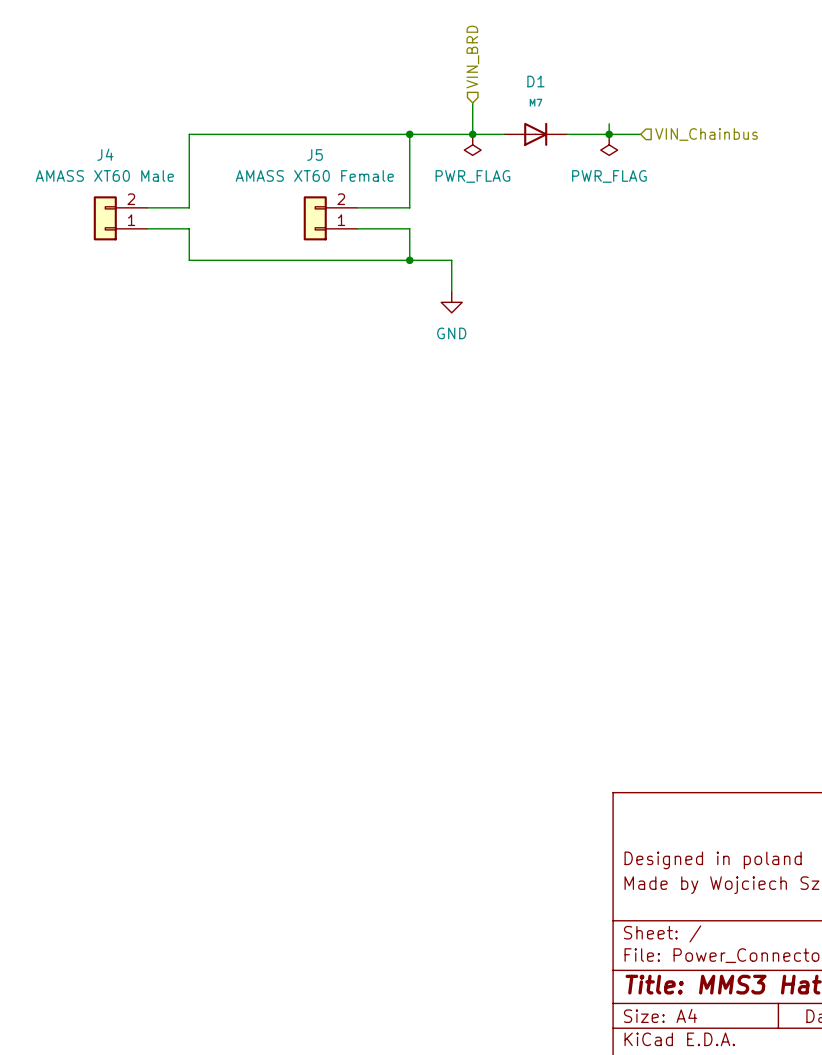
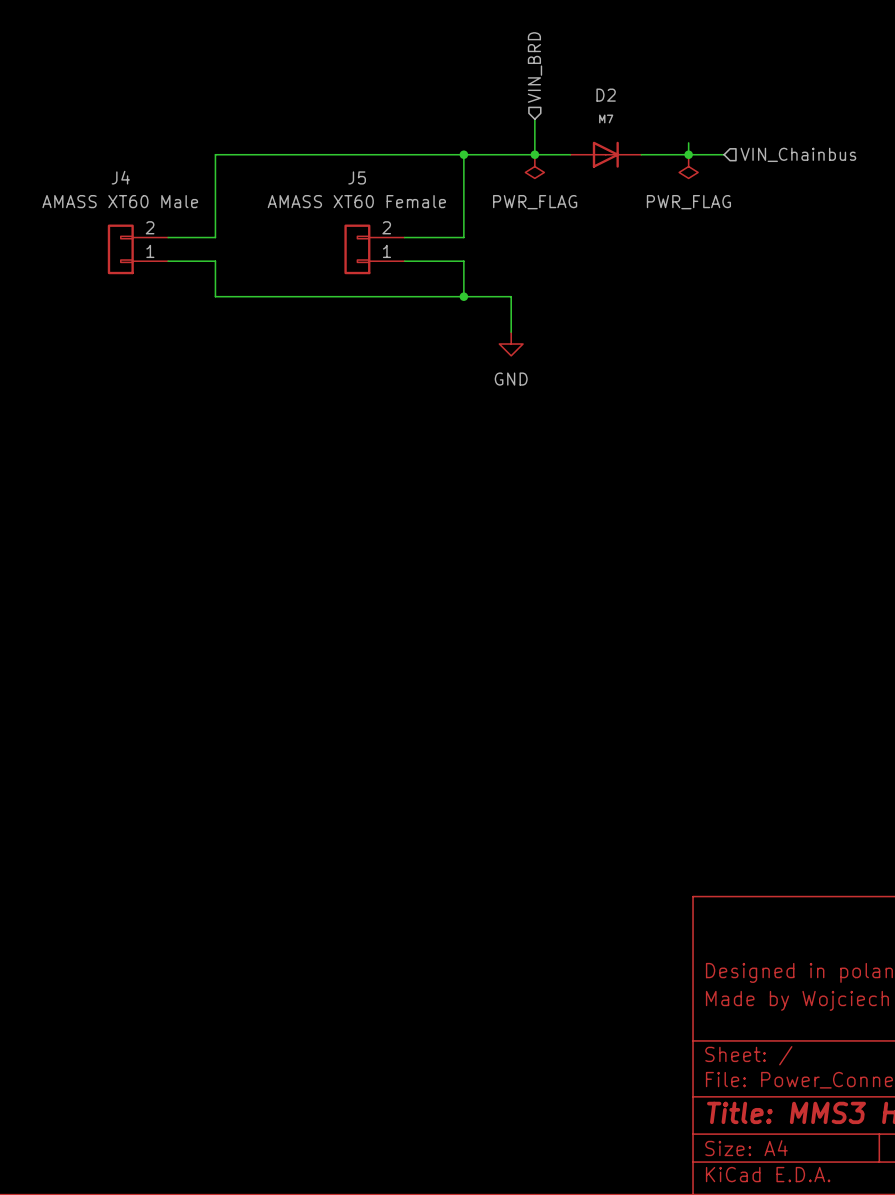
D1 name: D1 (535, 81) -> D2 (606, 95)

